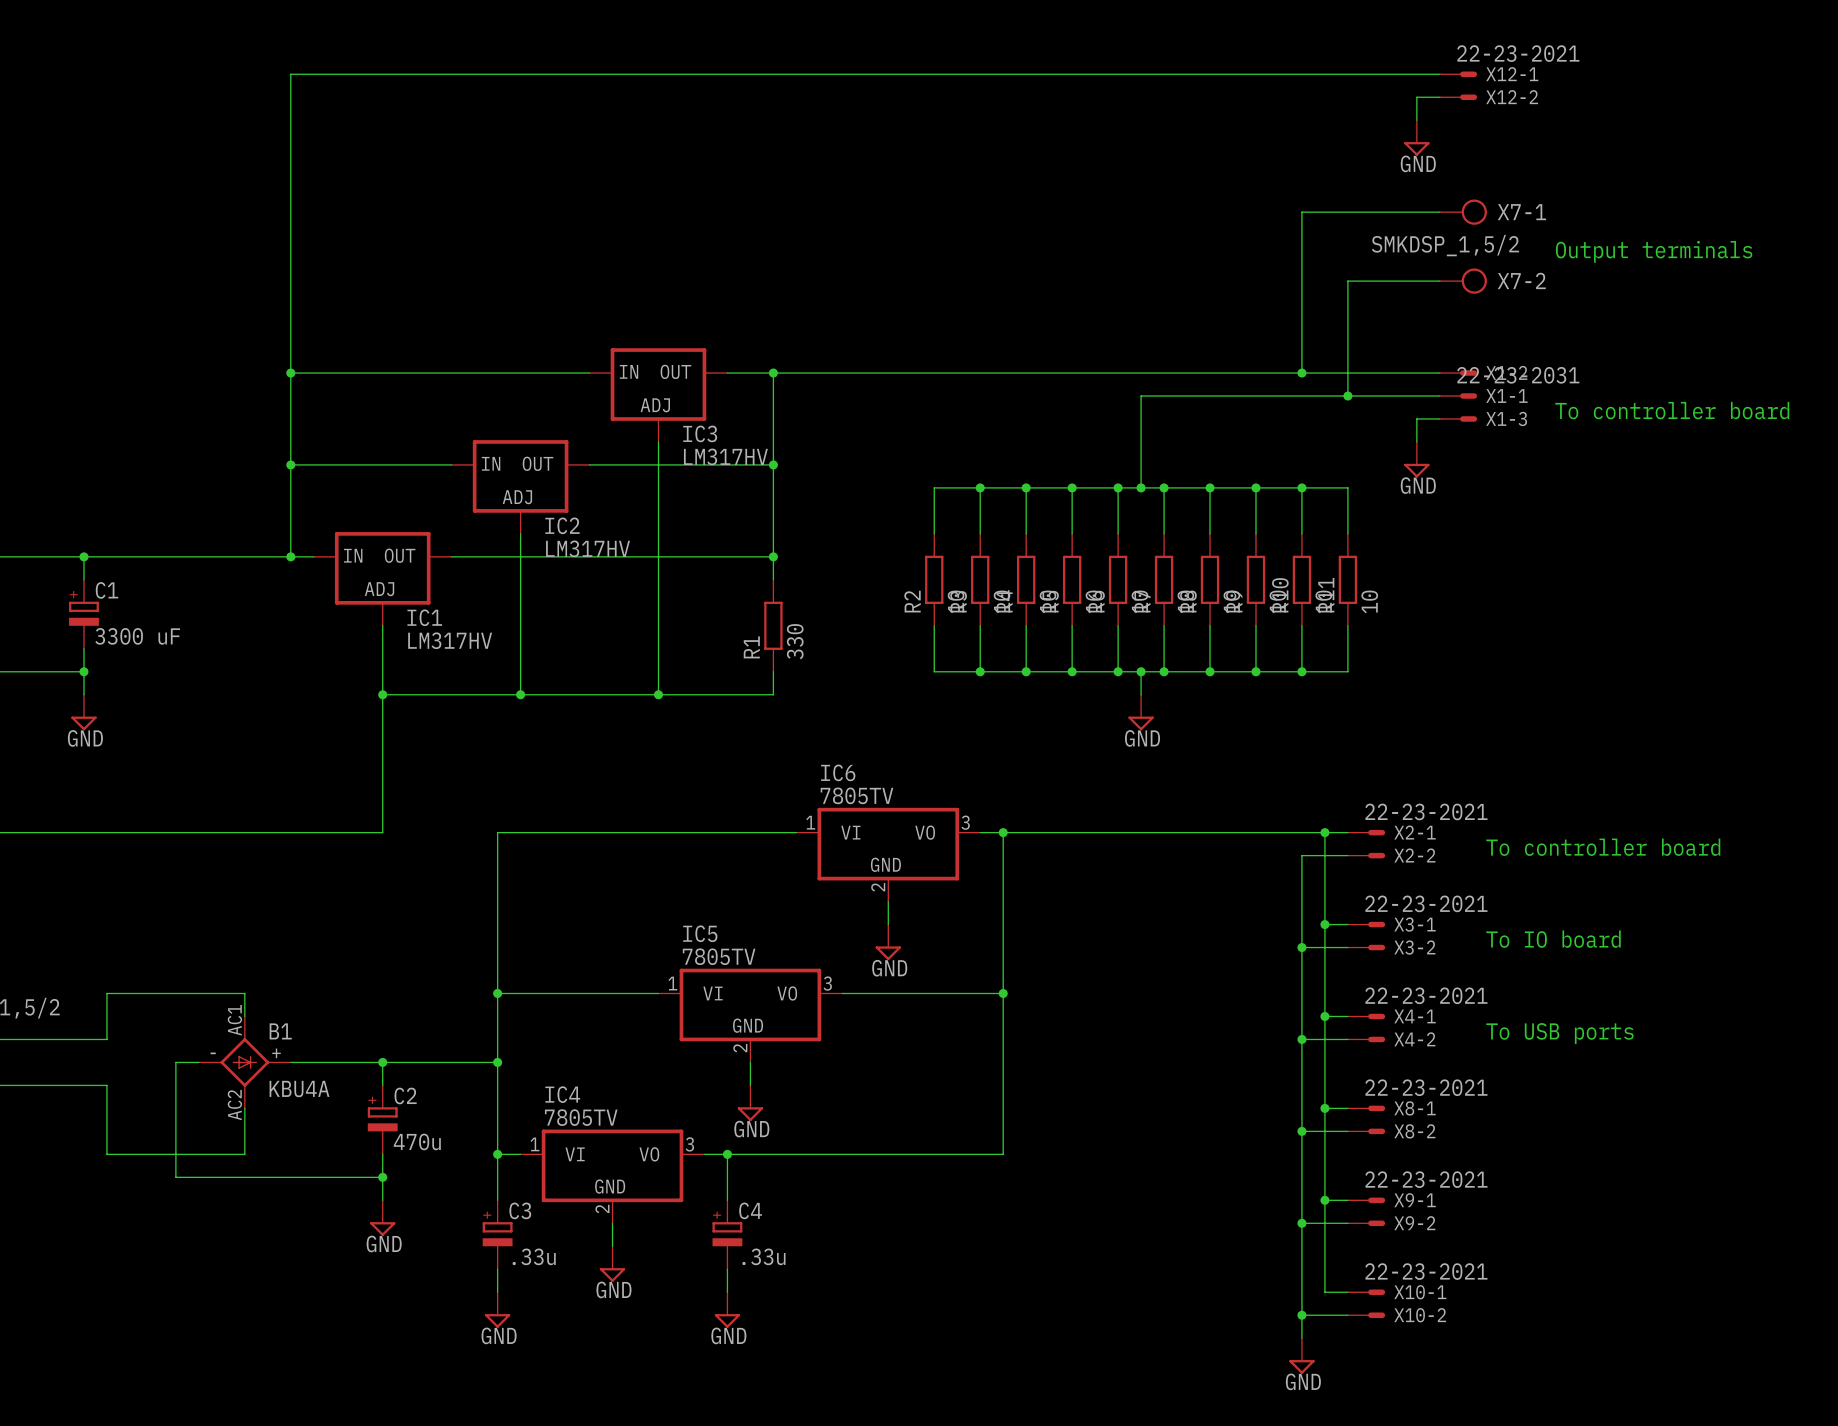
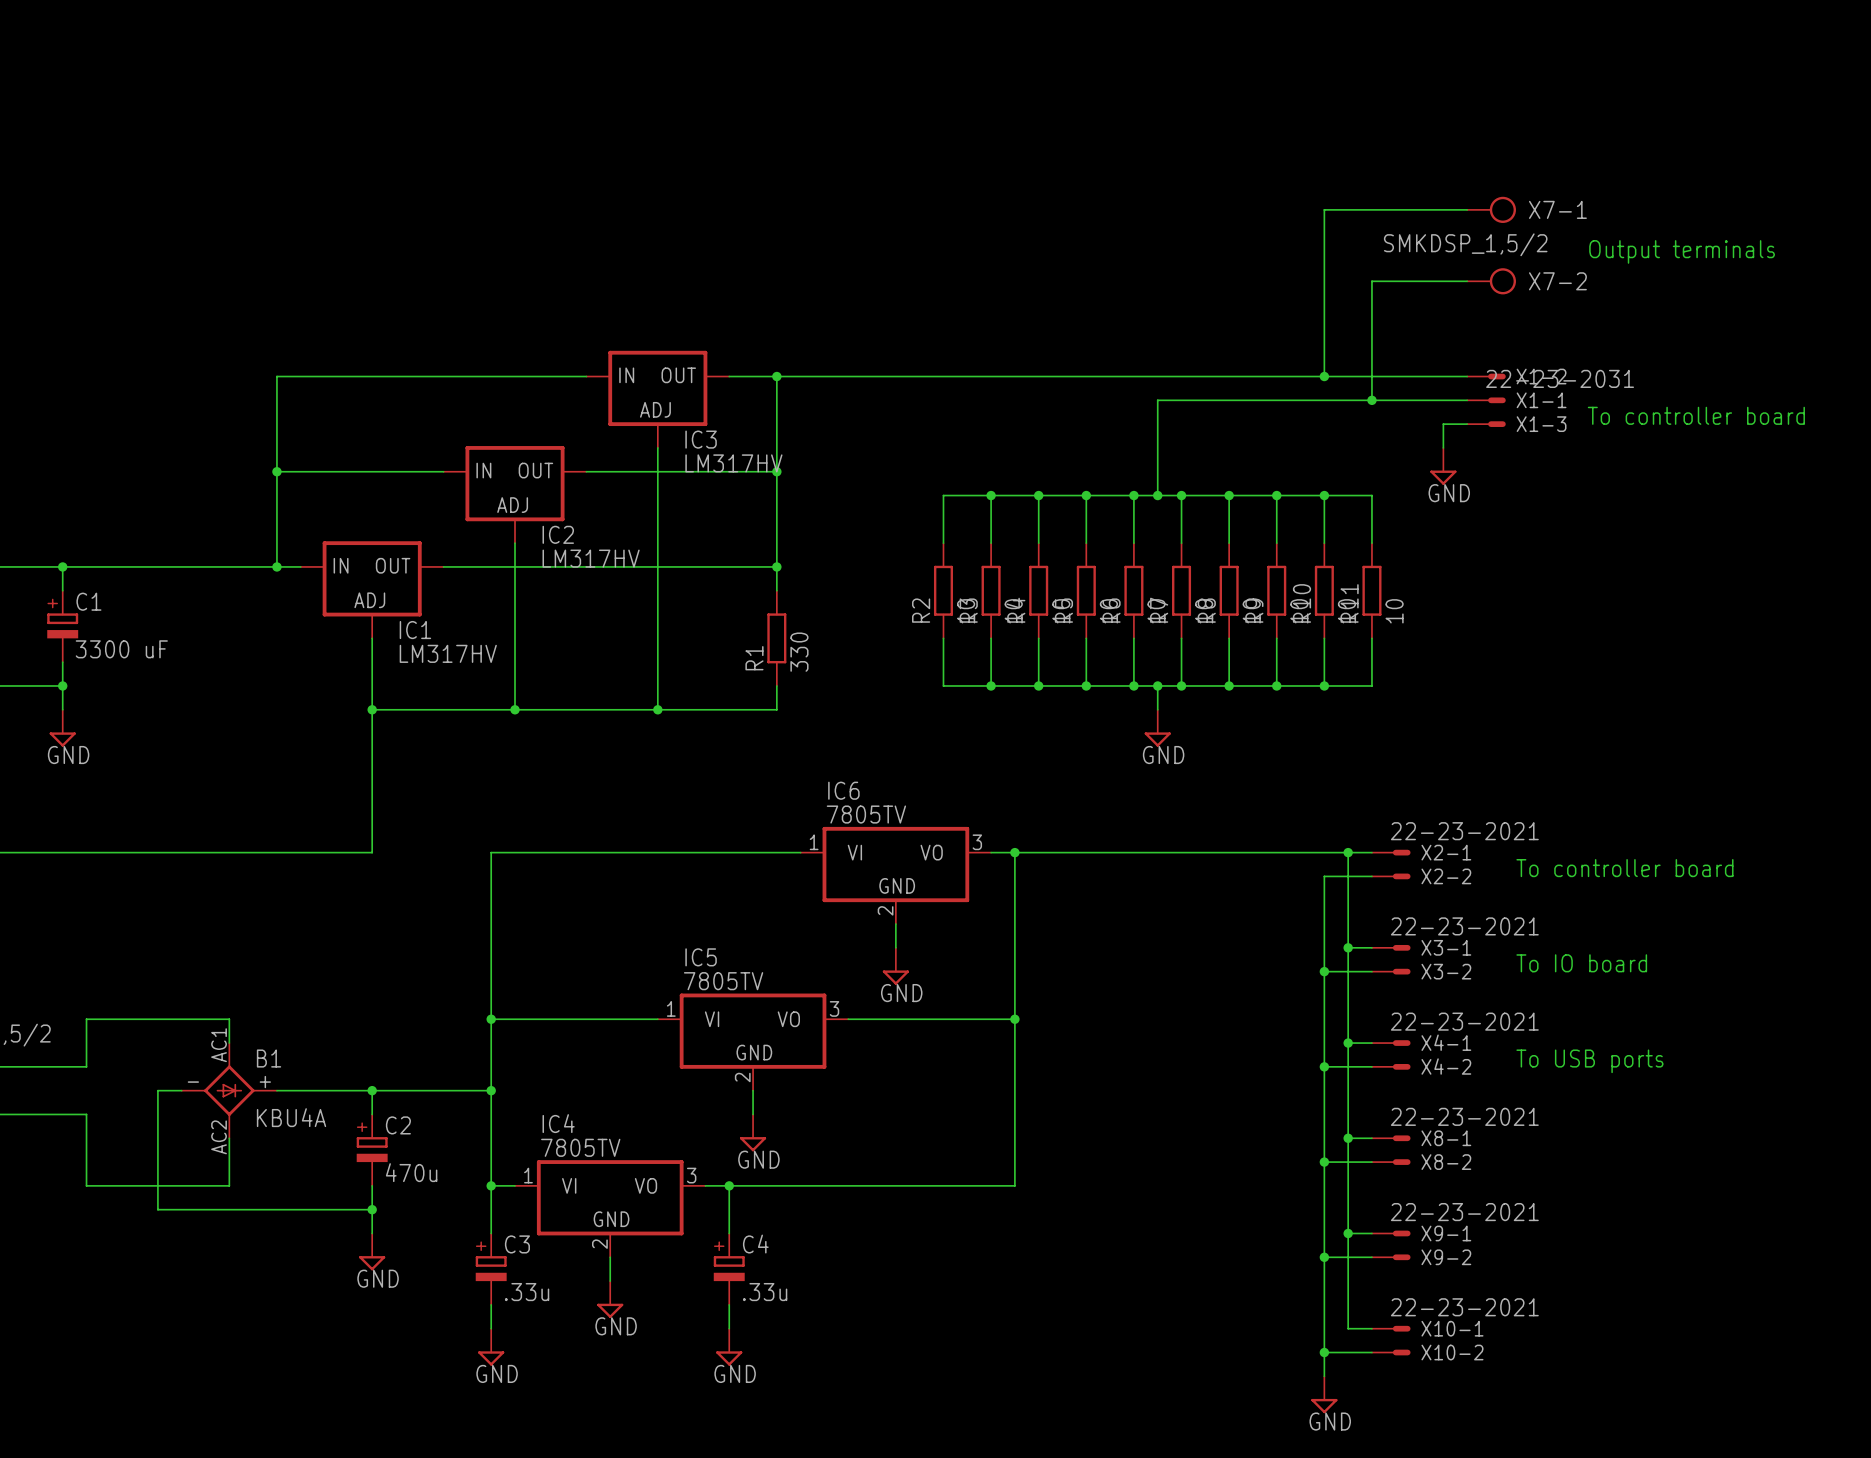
wire: (1439, 74) (290, 74) (290, 373) -> none
X12-1: 22-23-2021 (1458, 74) -> none
wire: (1439, 97) (1416, 97) (1416, 120) -> none
X12-2: (1458, 97) -> none
power symbol: GND (1416, 138) -> none
junction: (290, 373) -> none

